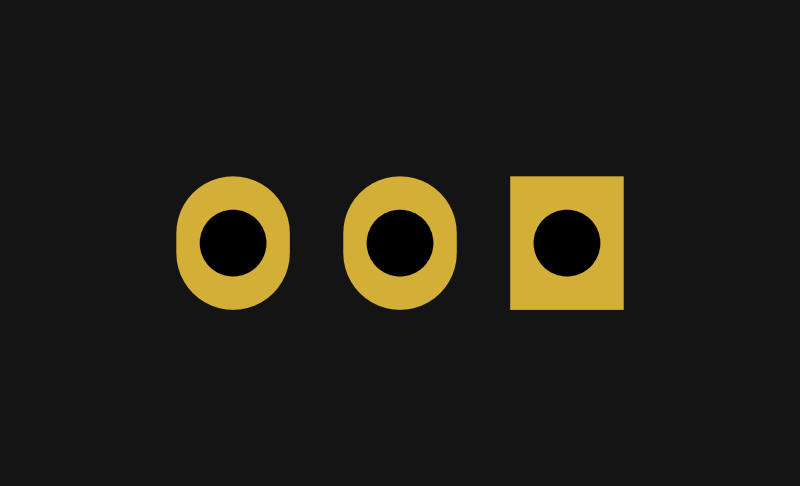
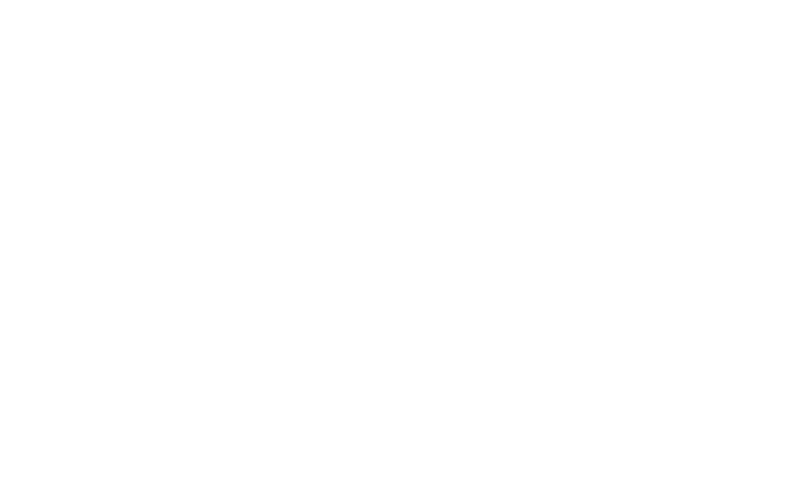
part: (400, 243) -> none

